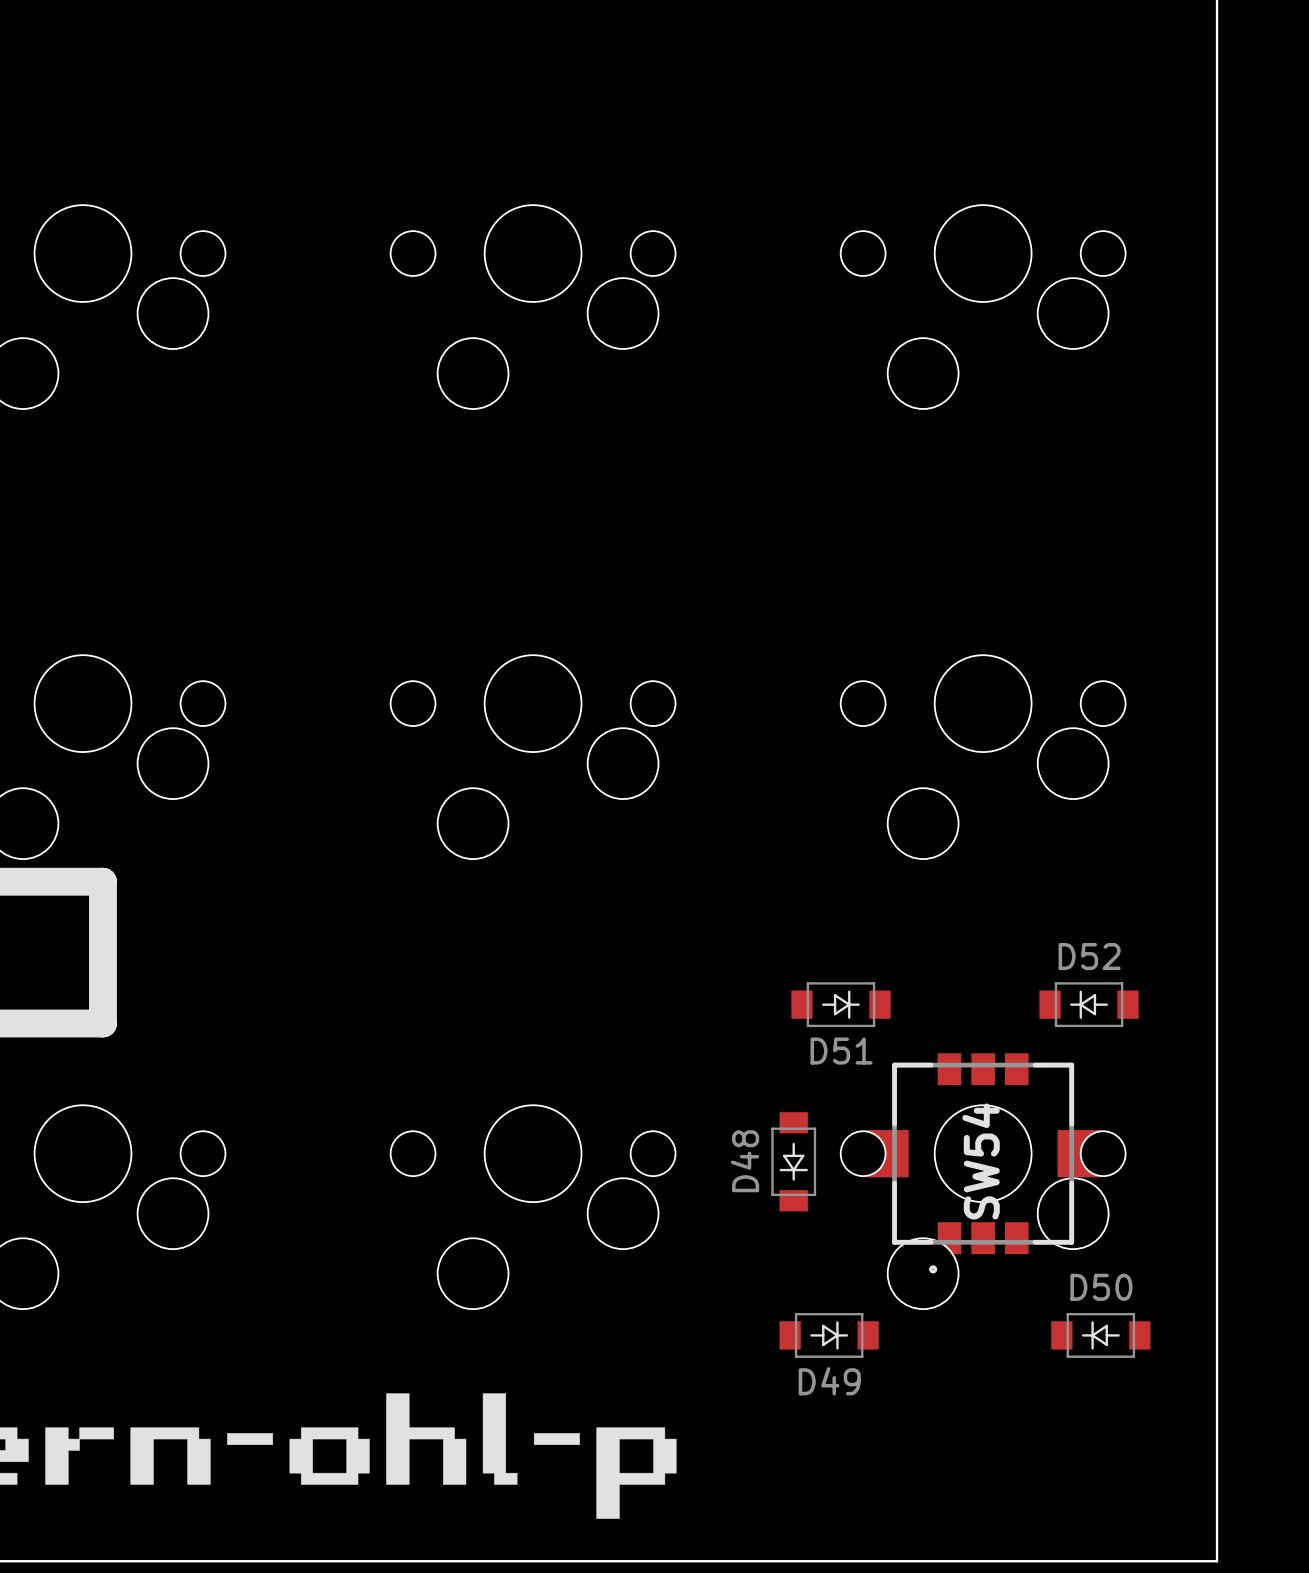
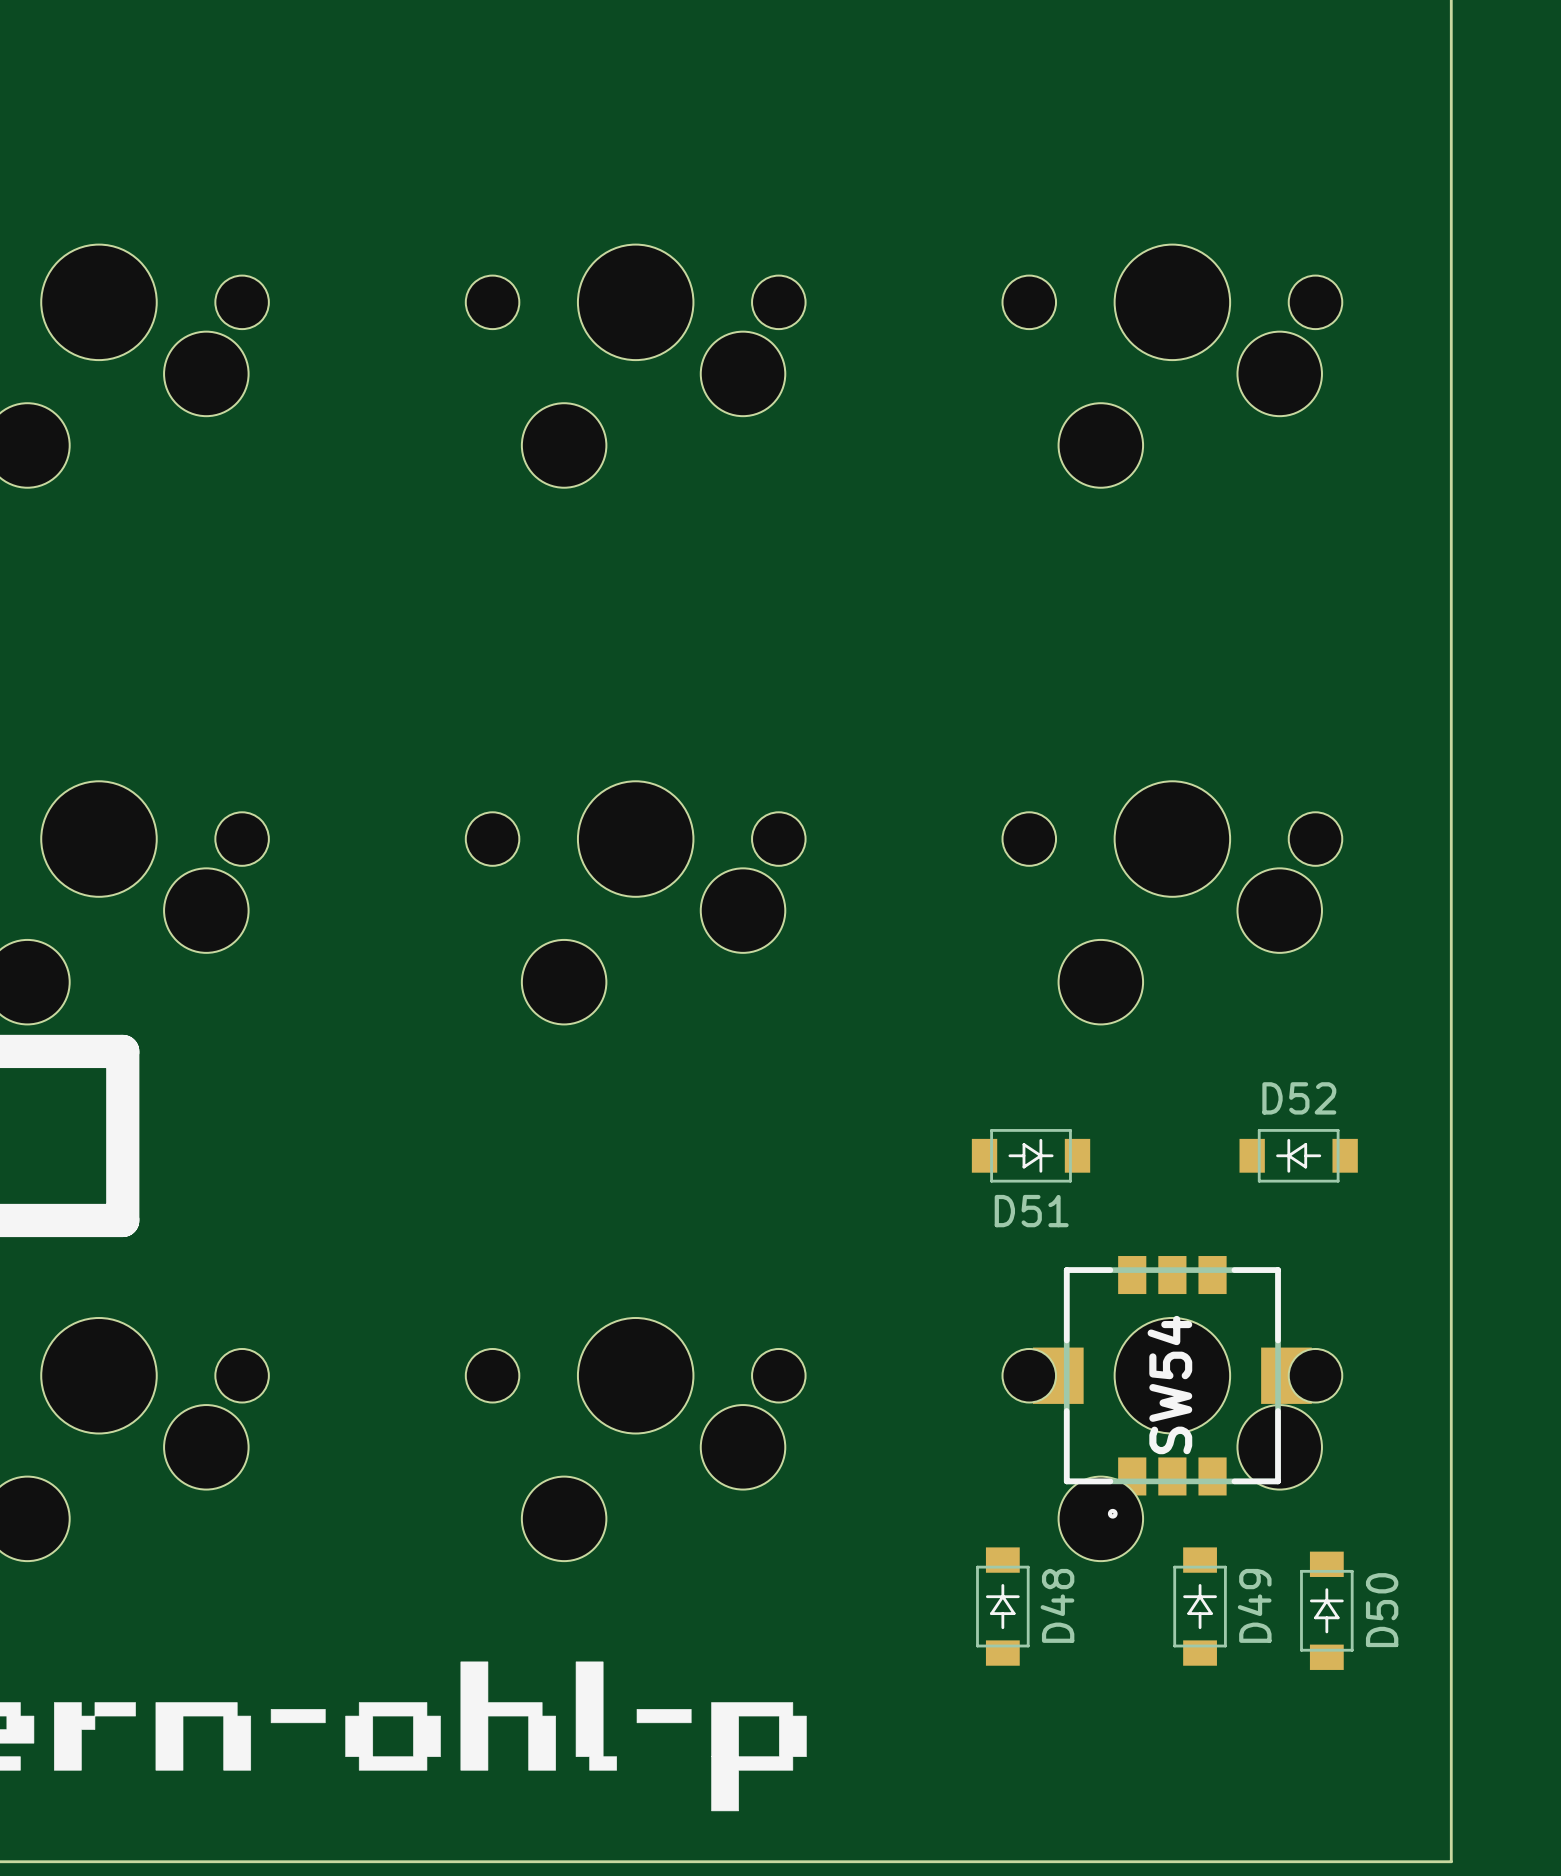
D51 position: (840, 1004) -> (1031, 1155)
D52 position: (1089, 1004) -> (1298, 1155)
D48 rotation: 0° (793, 1161) -> 180° (1002, 1606)
D48 position: (793, 1161) -> (1002, 1606)
D49 rotation: 0° (829, 1335) -> 90° counterclockwise (1200, 1606)
D49 position: (829, 1335) -> (1200, 1606)
D50 rotation: 0° (1100, 1335) -> 90° clockwise (1326, 1610)

